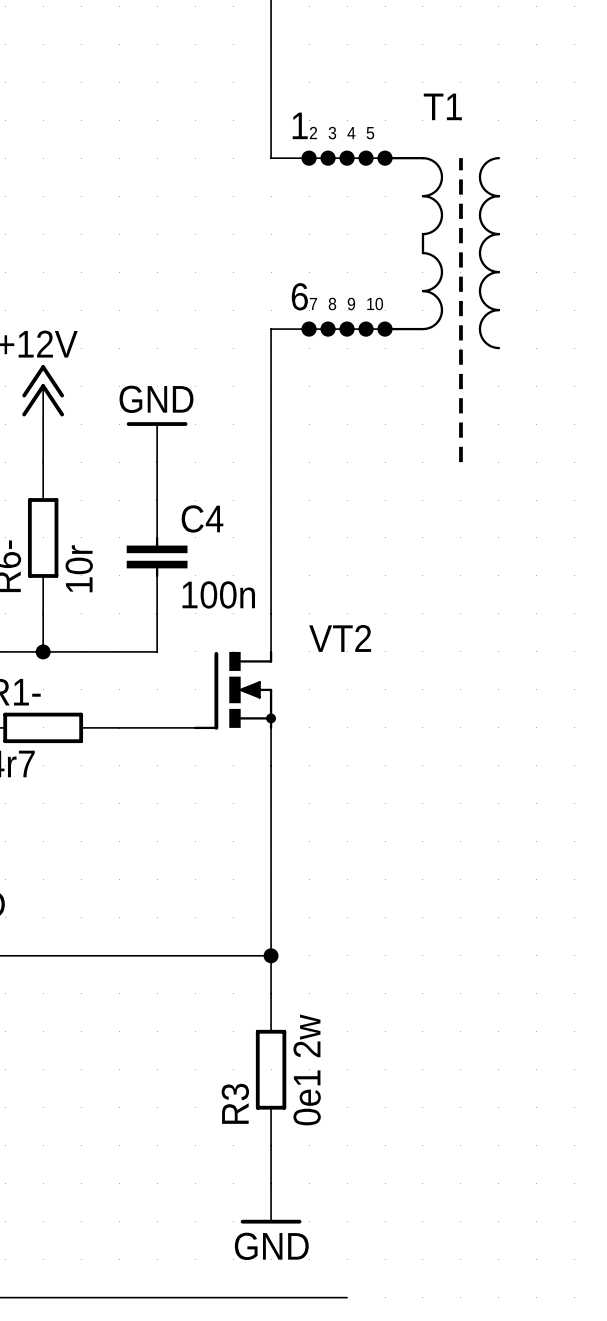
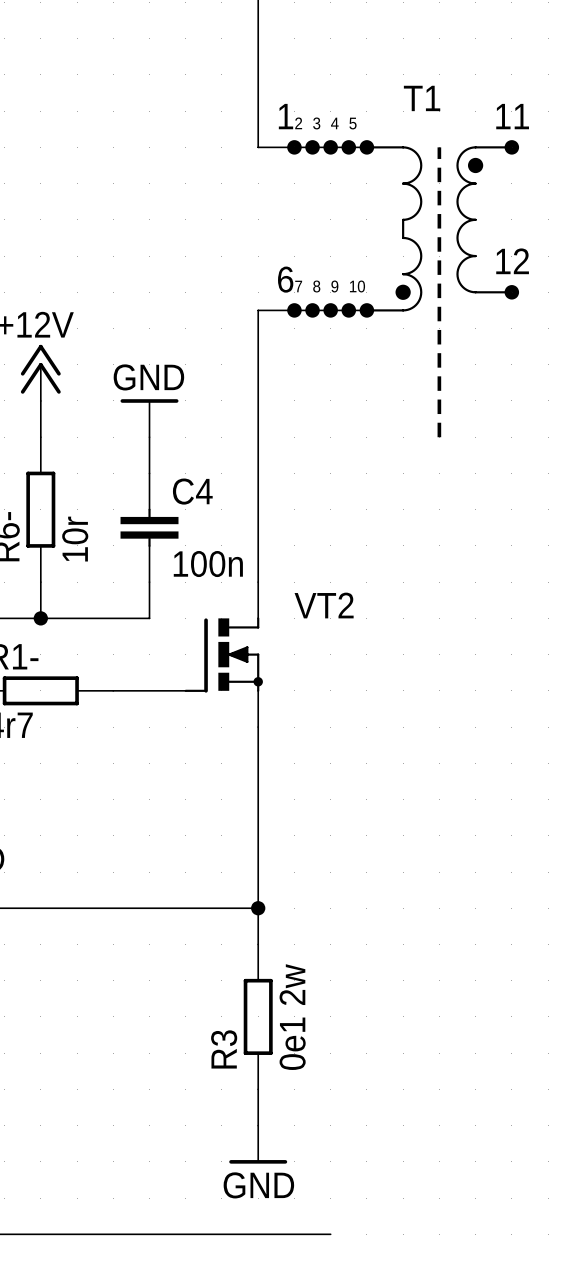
line: none -> (475, 147) (511, 147)
11: none -> (511, 147)
drawing: none -> [467, 157, 484, 174]
drawing: none -> [395, 284, 411, 300]
line: (498, 310) (485, 315) (479, 329) (485, 342) (498, 348) -> (475, 292) (511, 292)
12: none -> (511, 292)

